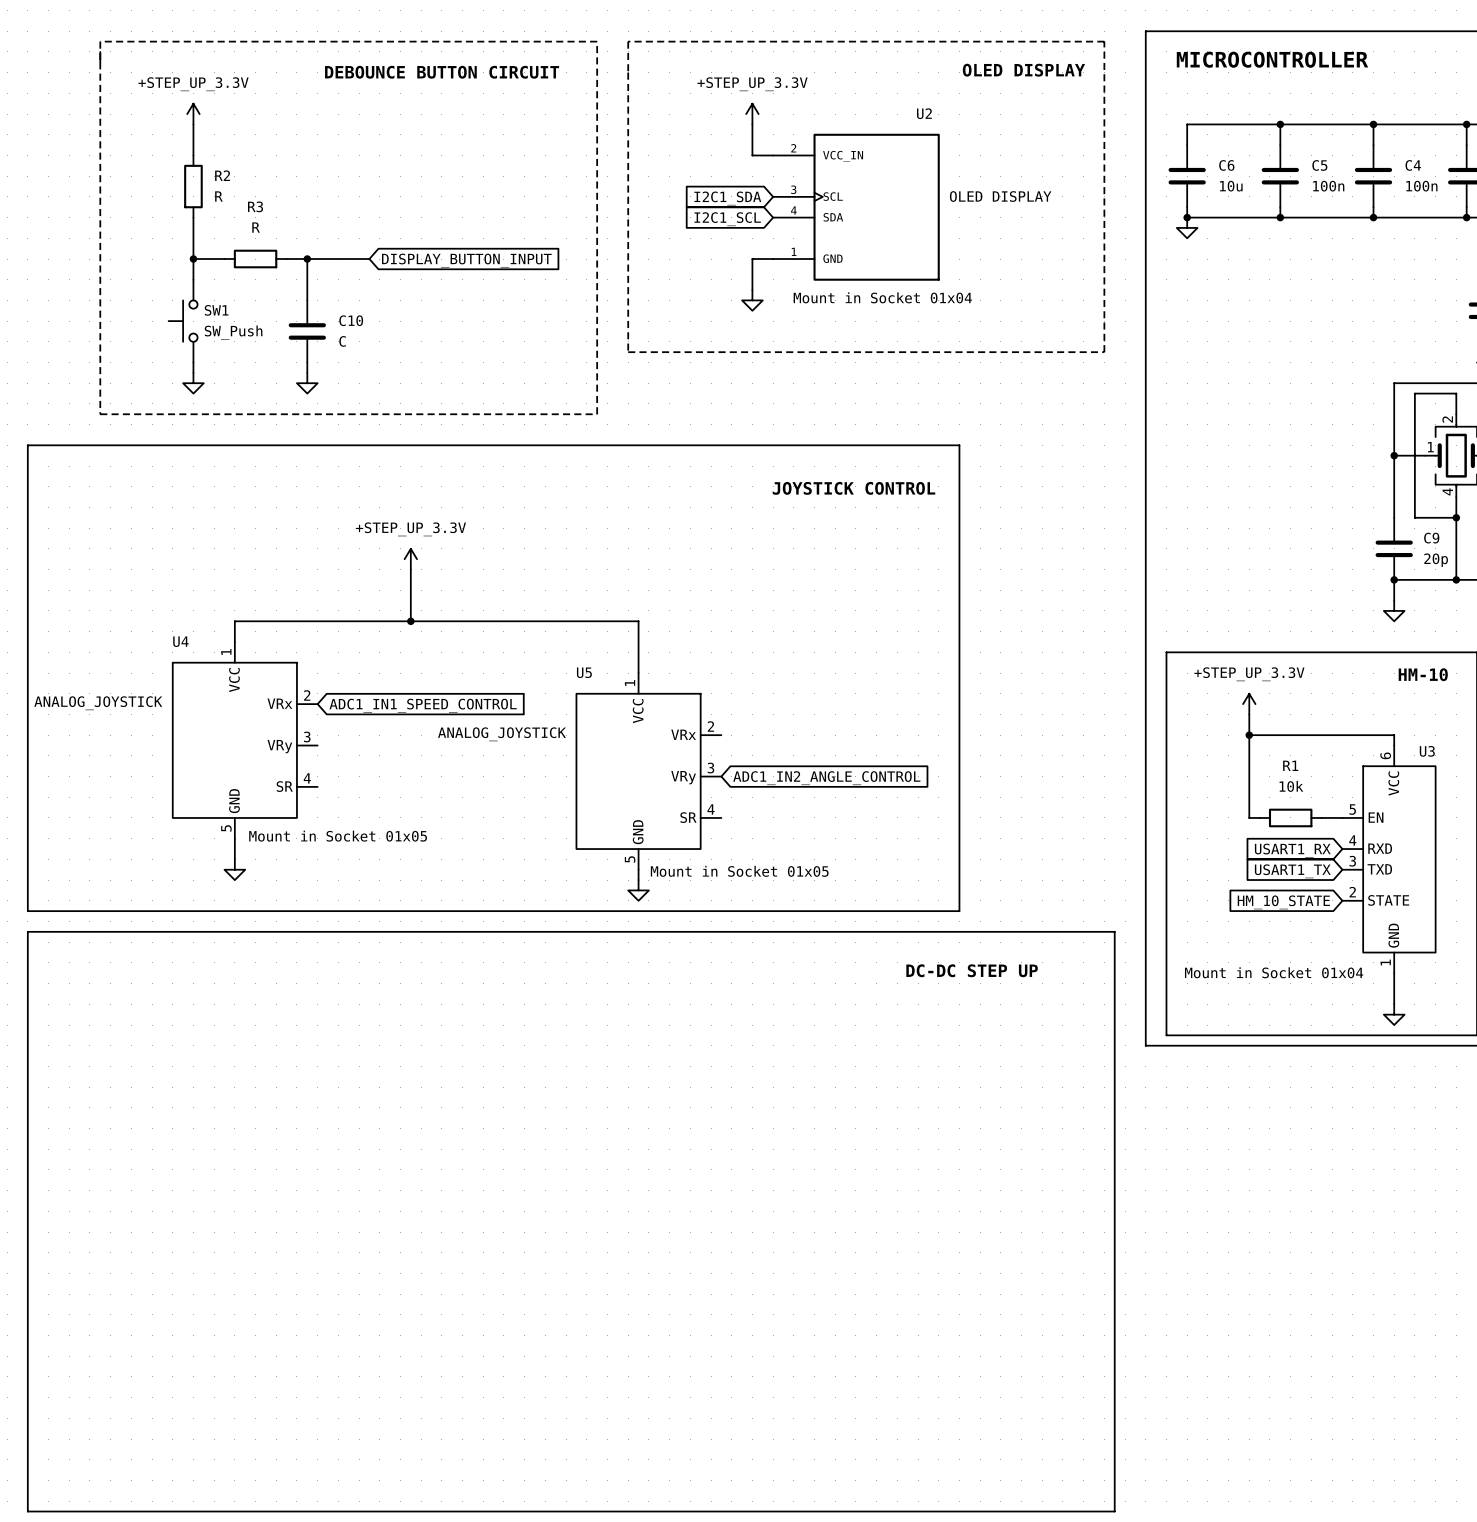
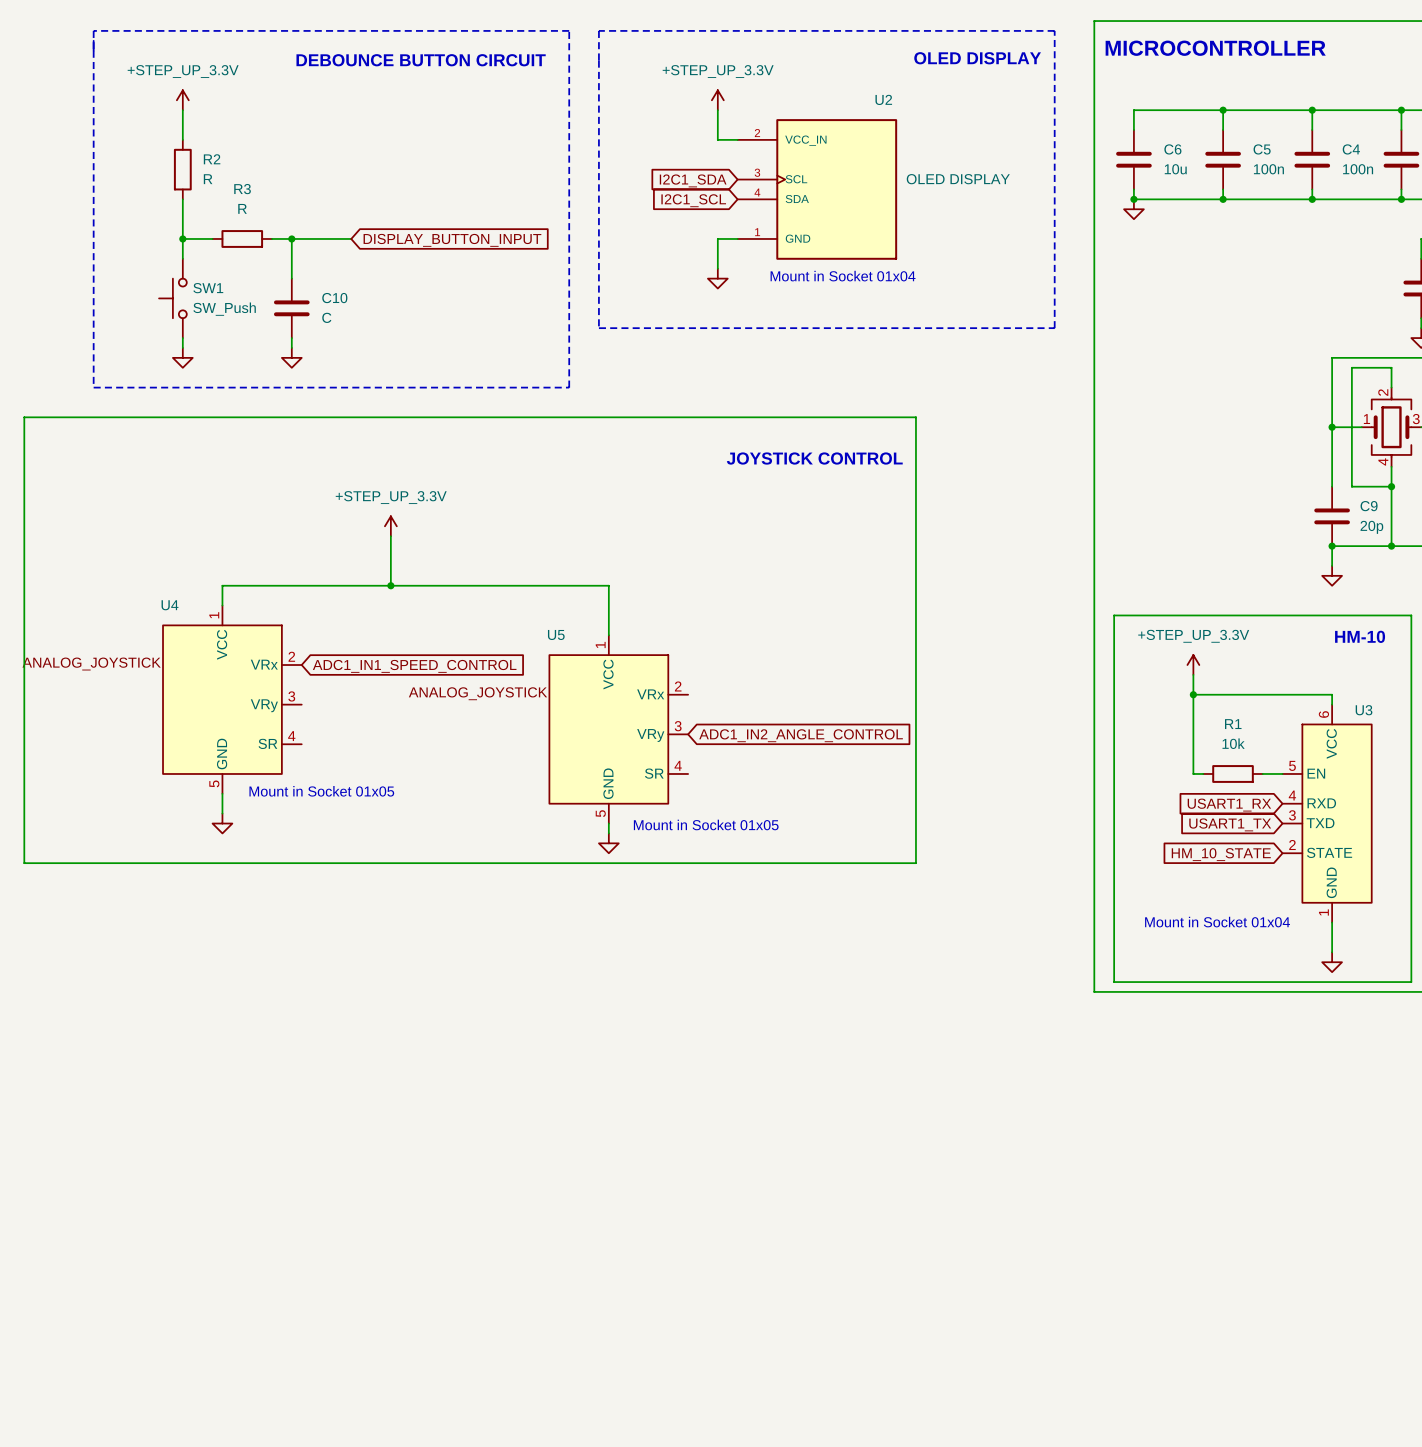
wire: (27, 931) (1114, 931) (1114, 1511) (27, 1511) (27, 931) -> none
text: DC-DC STEP UP (972, 970) -> none

